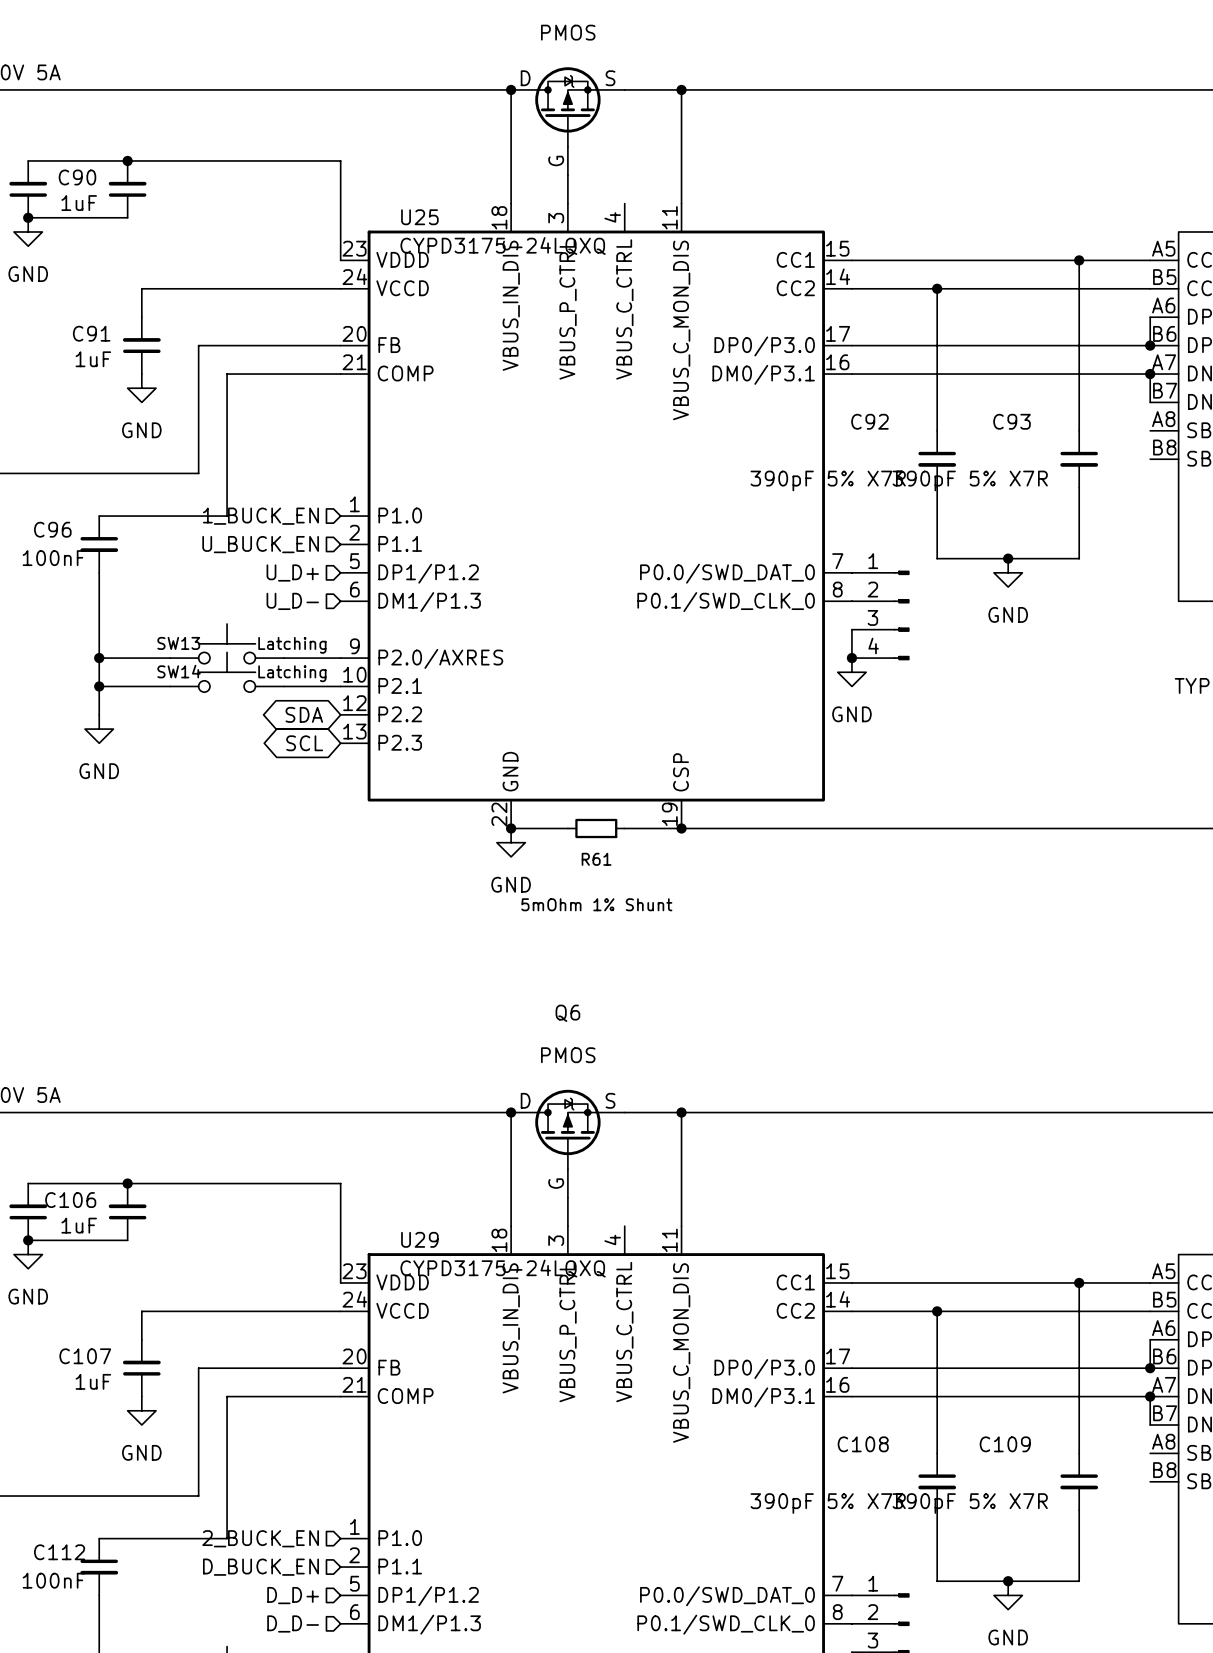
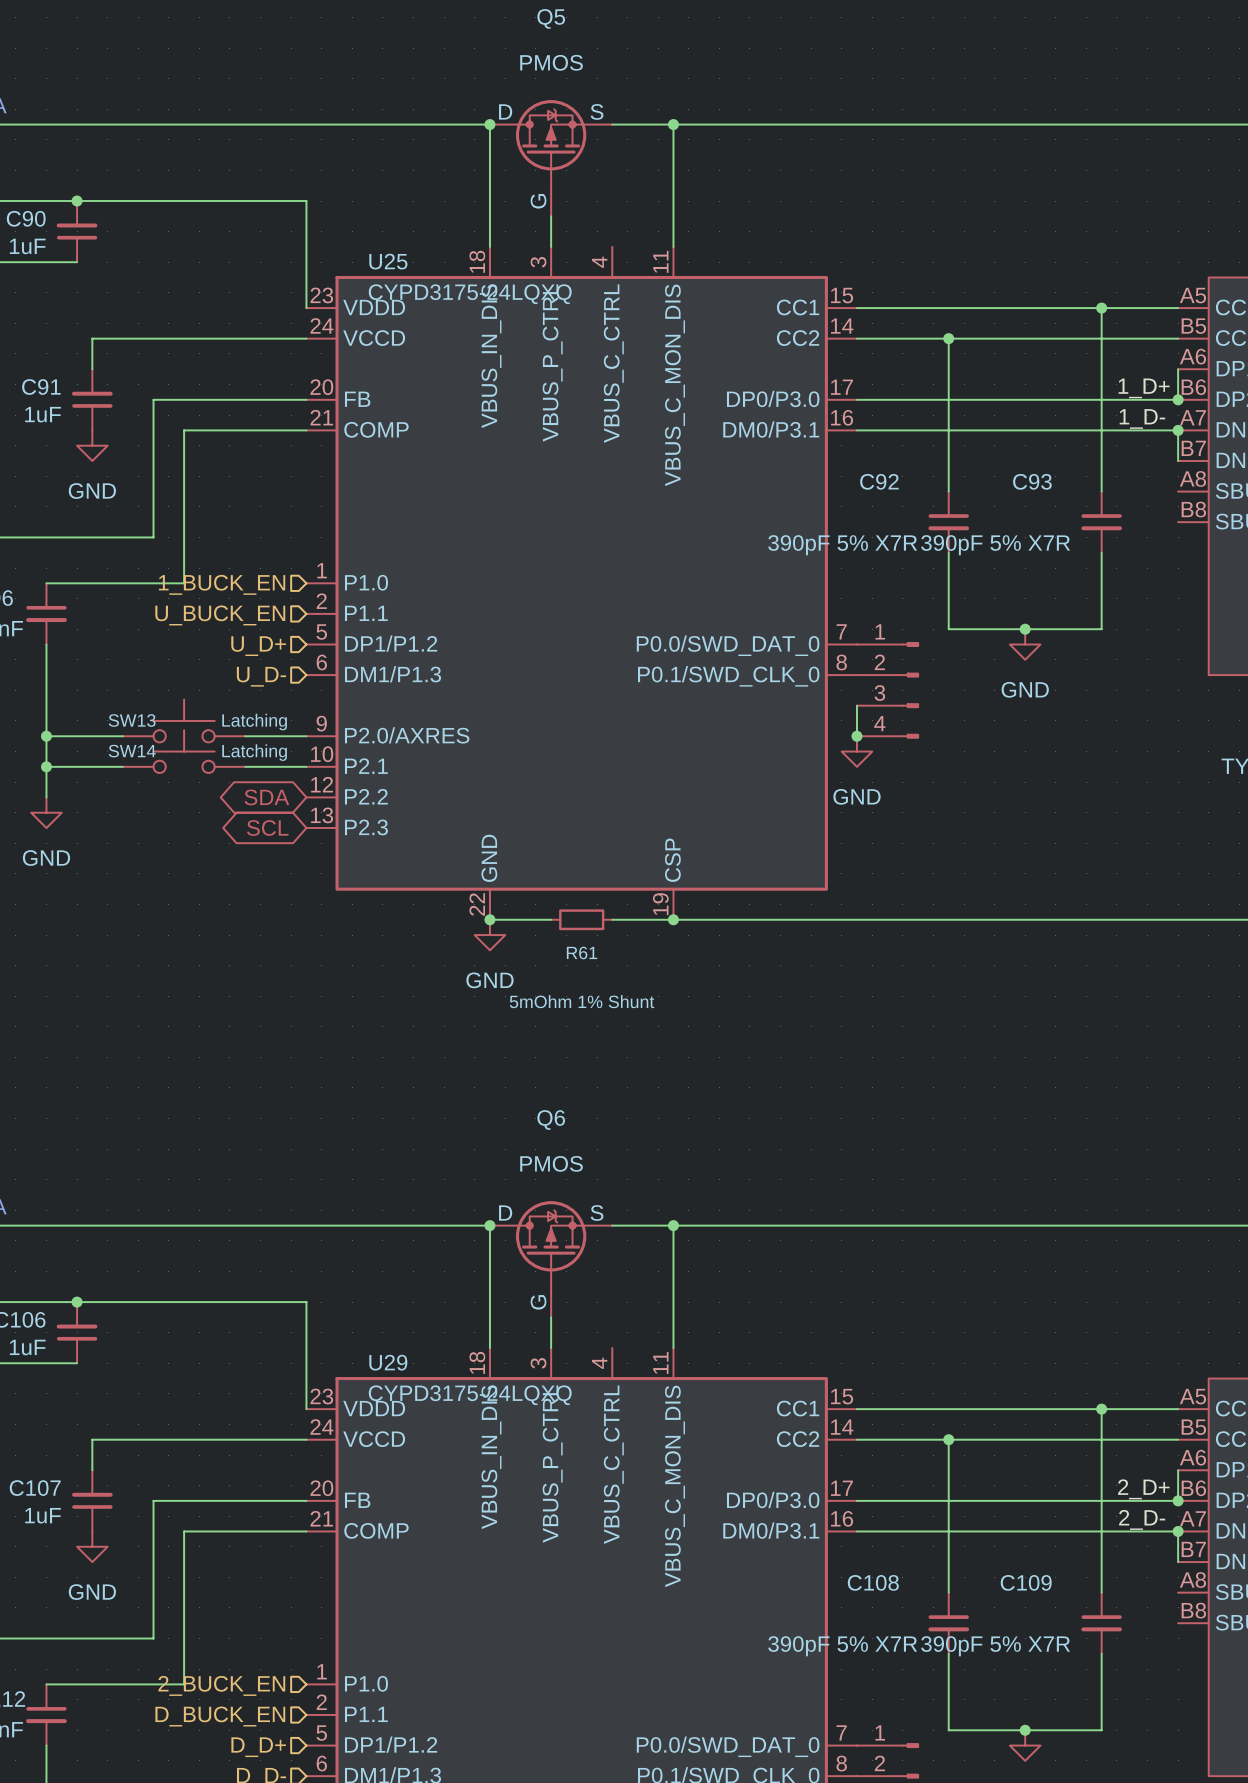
label: none -> 1_D+ (1144, 388)
label: none -> 1_D- (1142, 418)
label: none -> 2_D+ (1143, 1489)
label: none -> 2_D- (1142, 1519)

